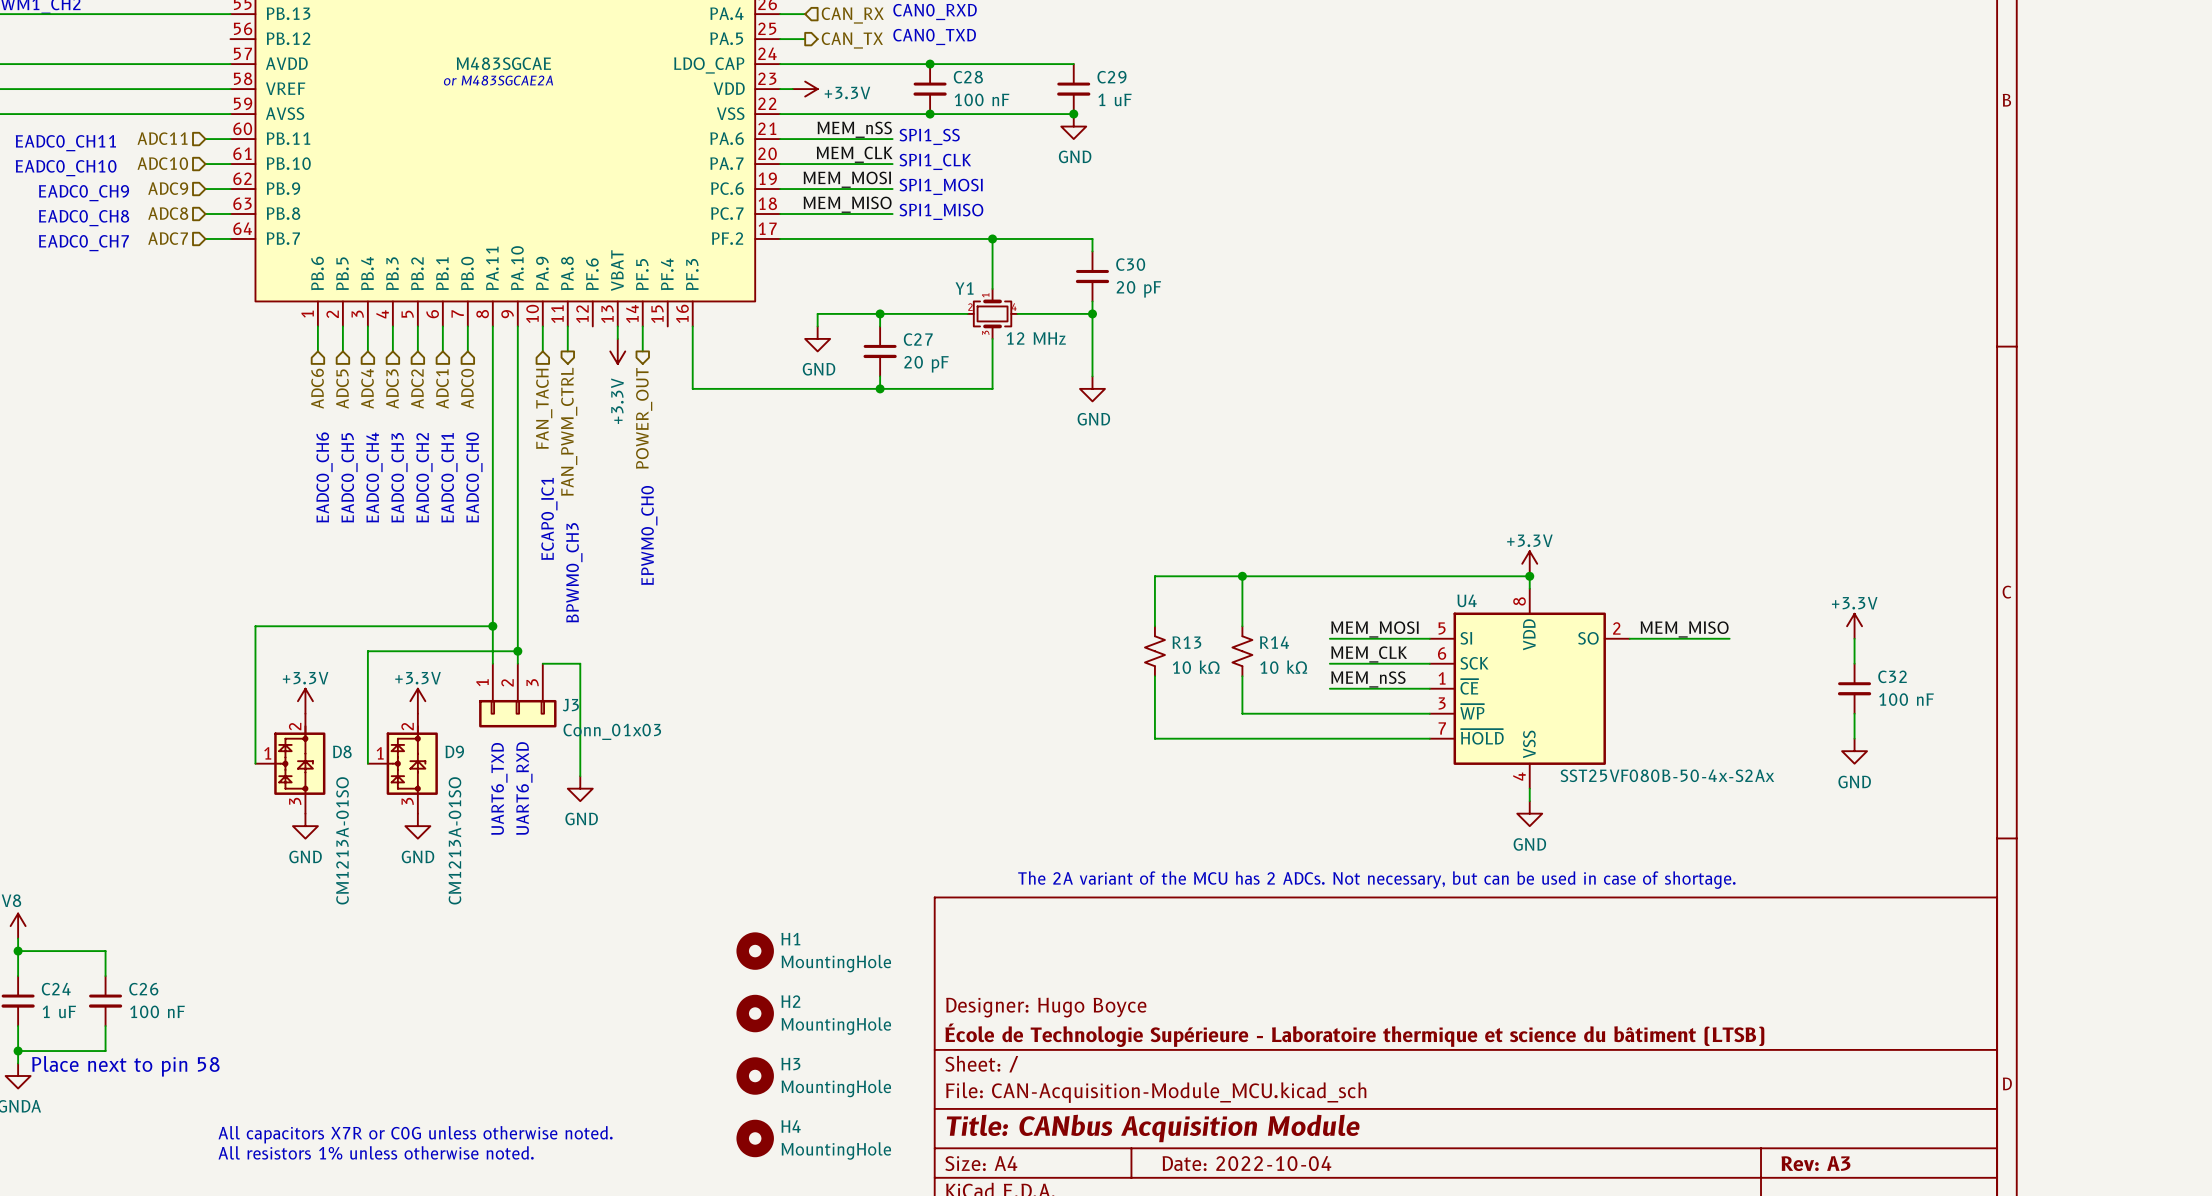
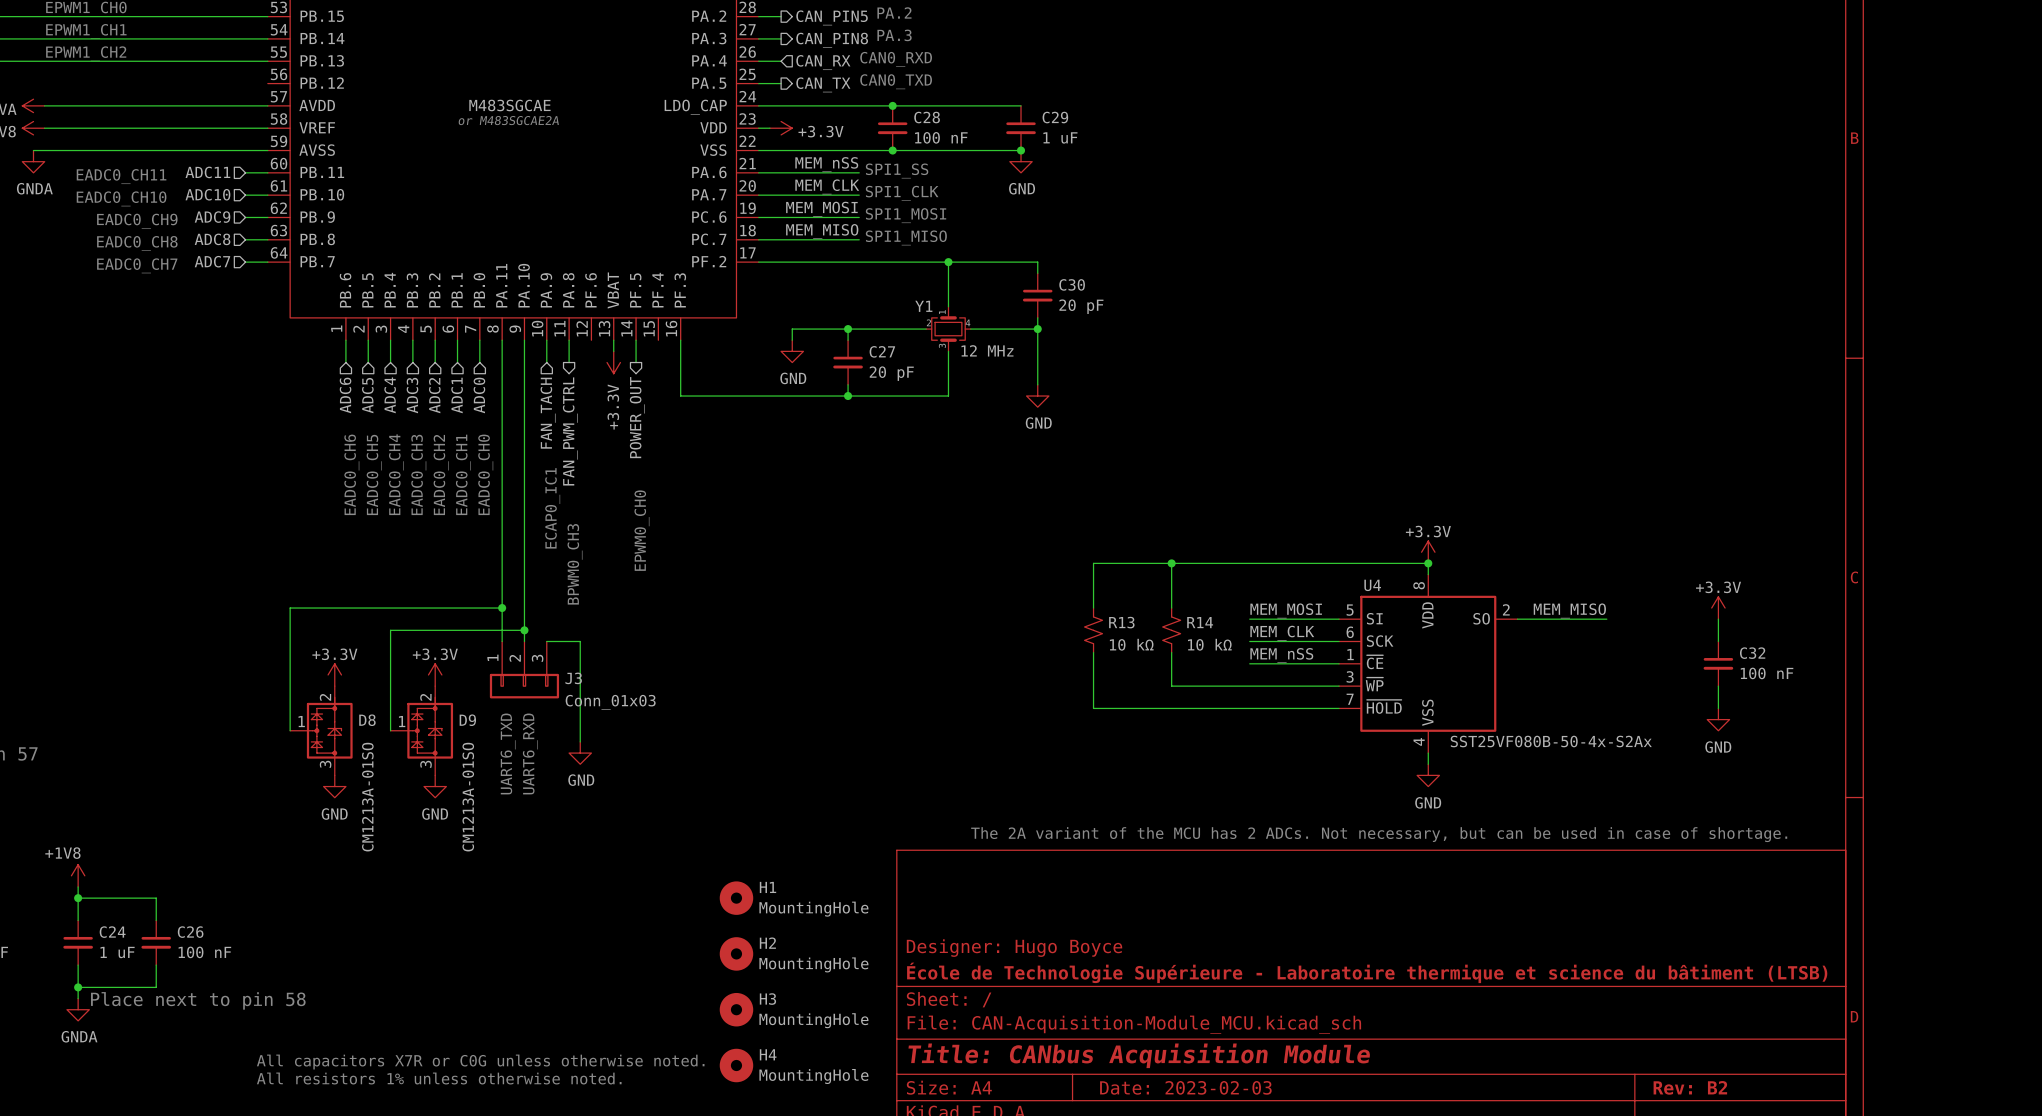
title block: Date: 2022-10-04 (1246, 1163) -> Date: 2023-02-03 (1185, 1087)
title block: Rev: A3 (1815, 1163) -> Rev: B2 (1690, 1087)

